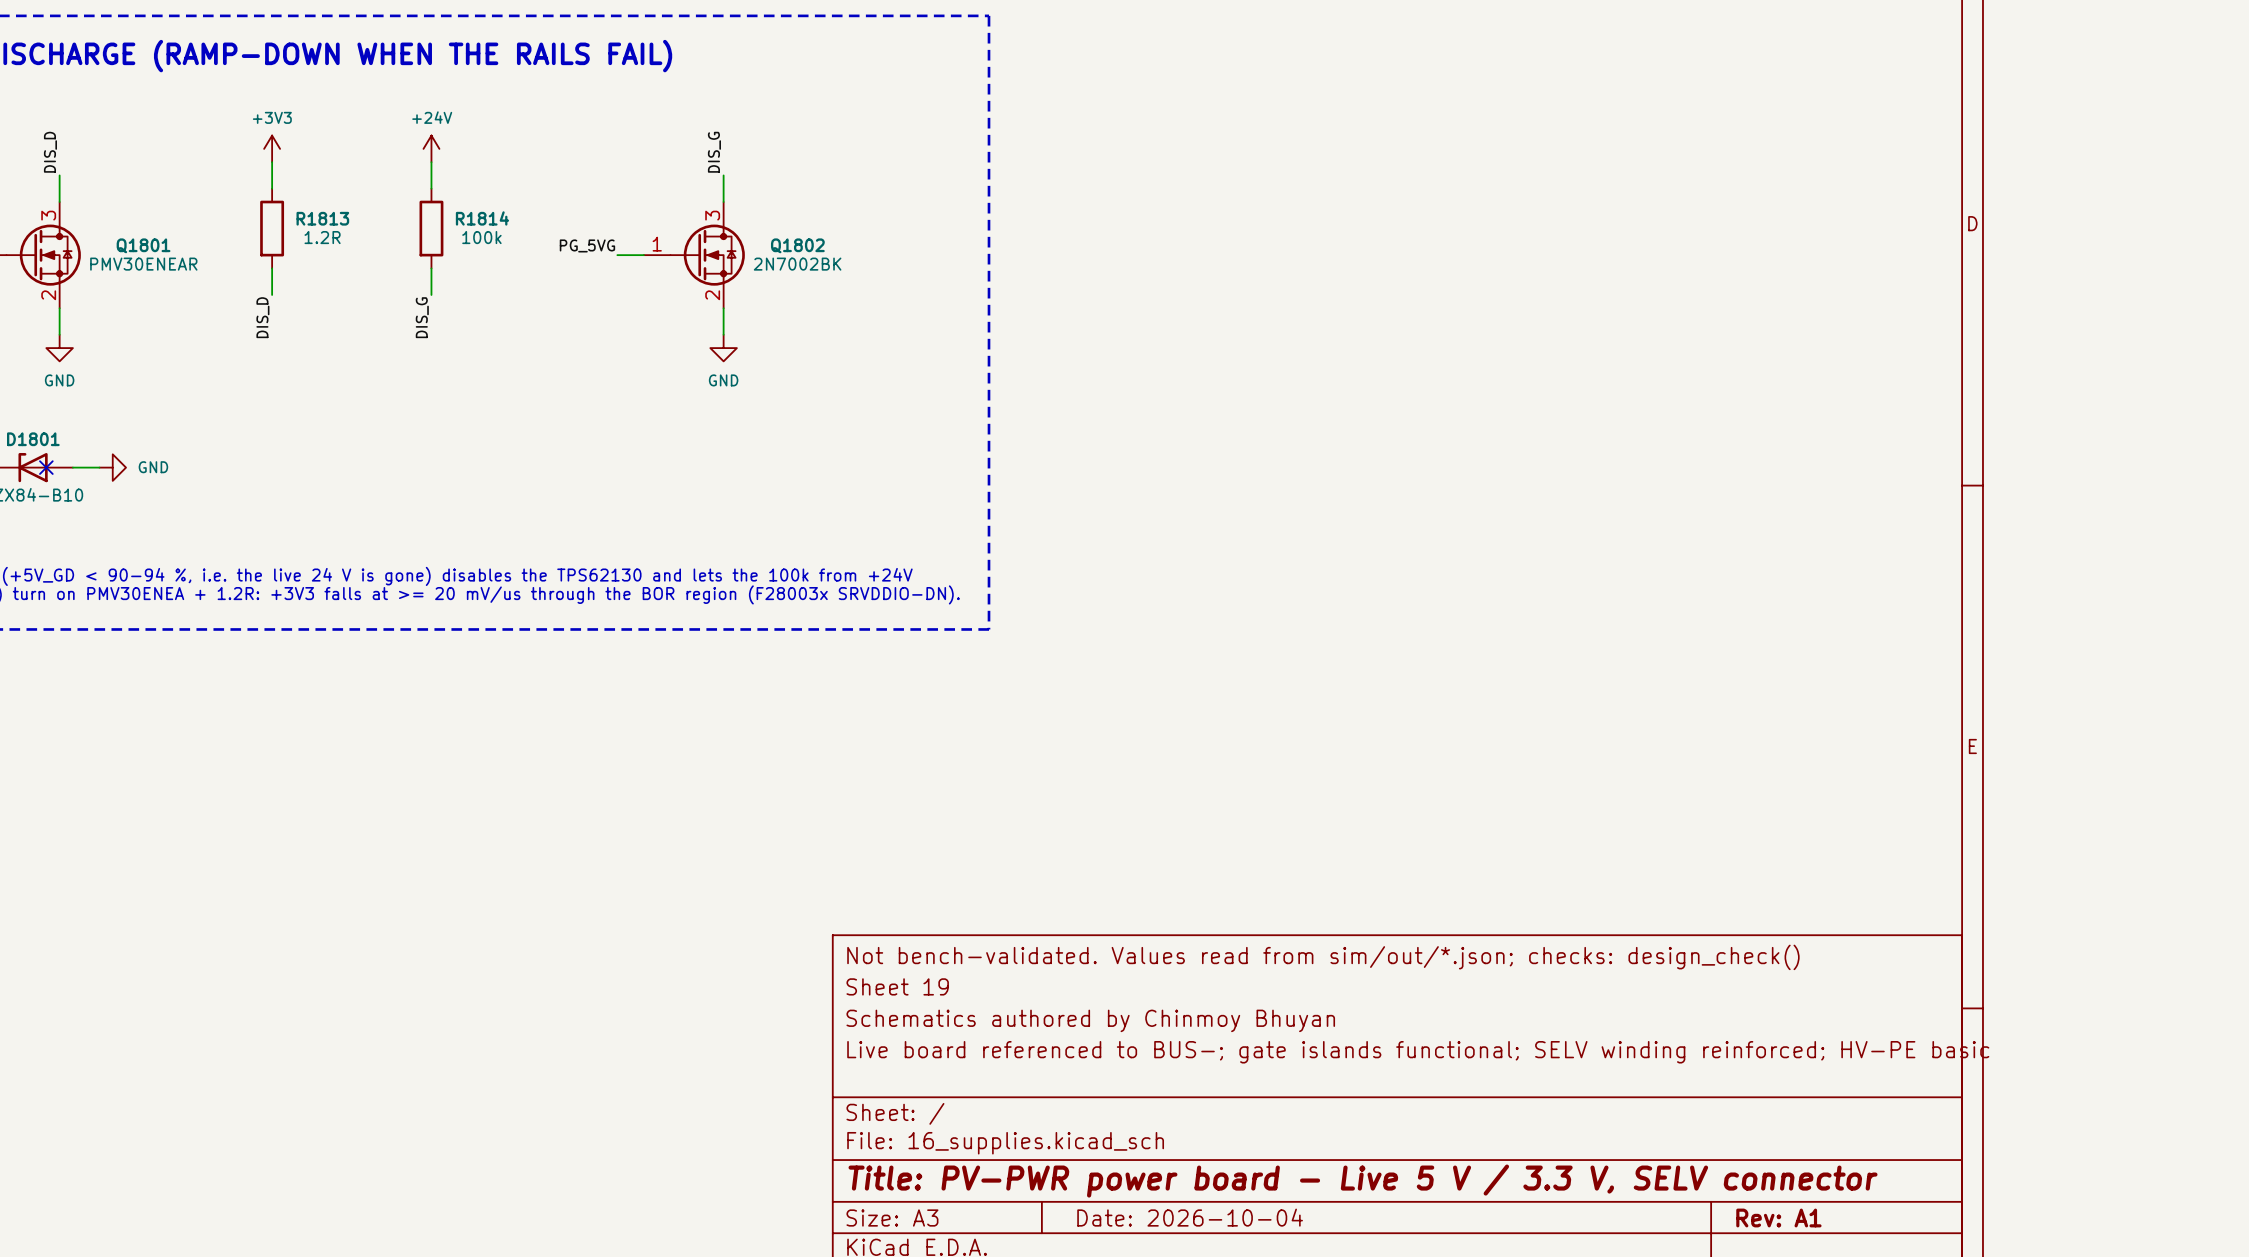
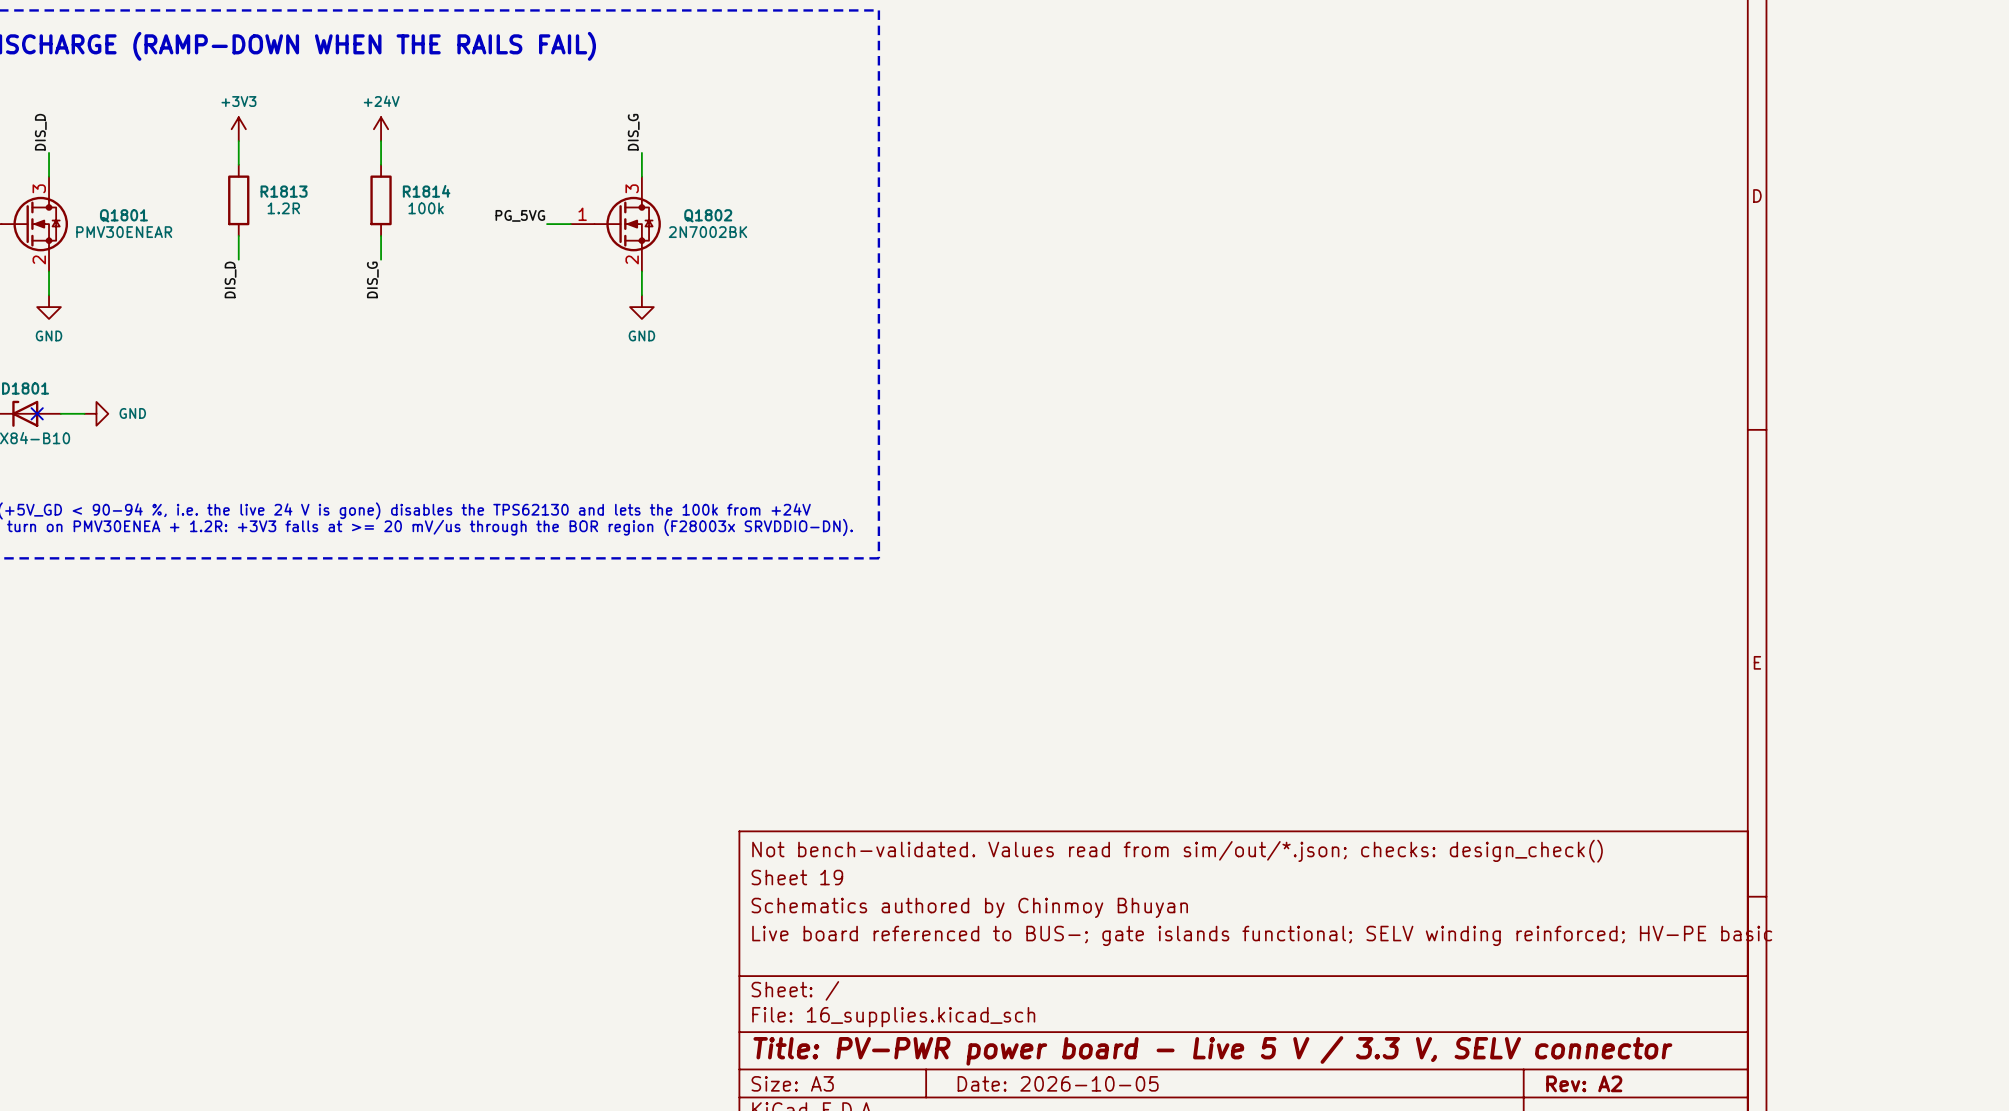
title block: Date: 2026-10-04 (1190, 1217) -> Date: 2026-10-05 (1058, 1083)
title block: Rev: A1 (1778, 1217) -> Rev: A2 (1584, 1083)

